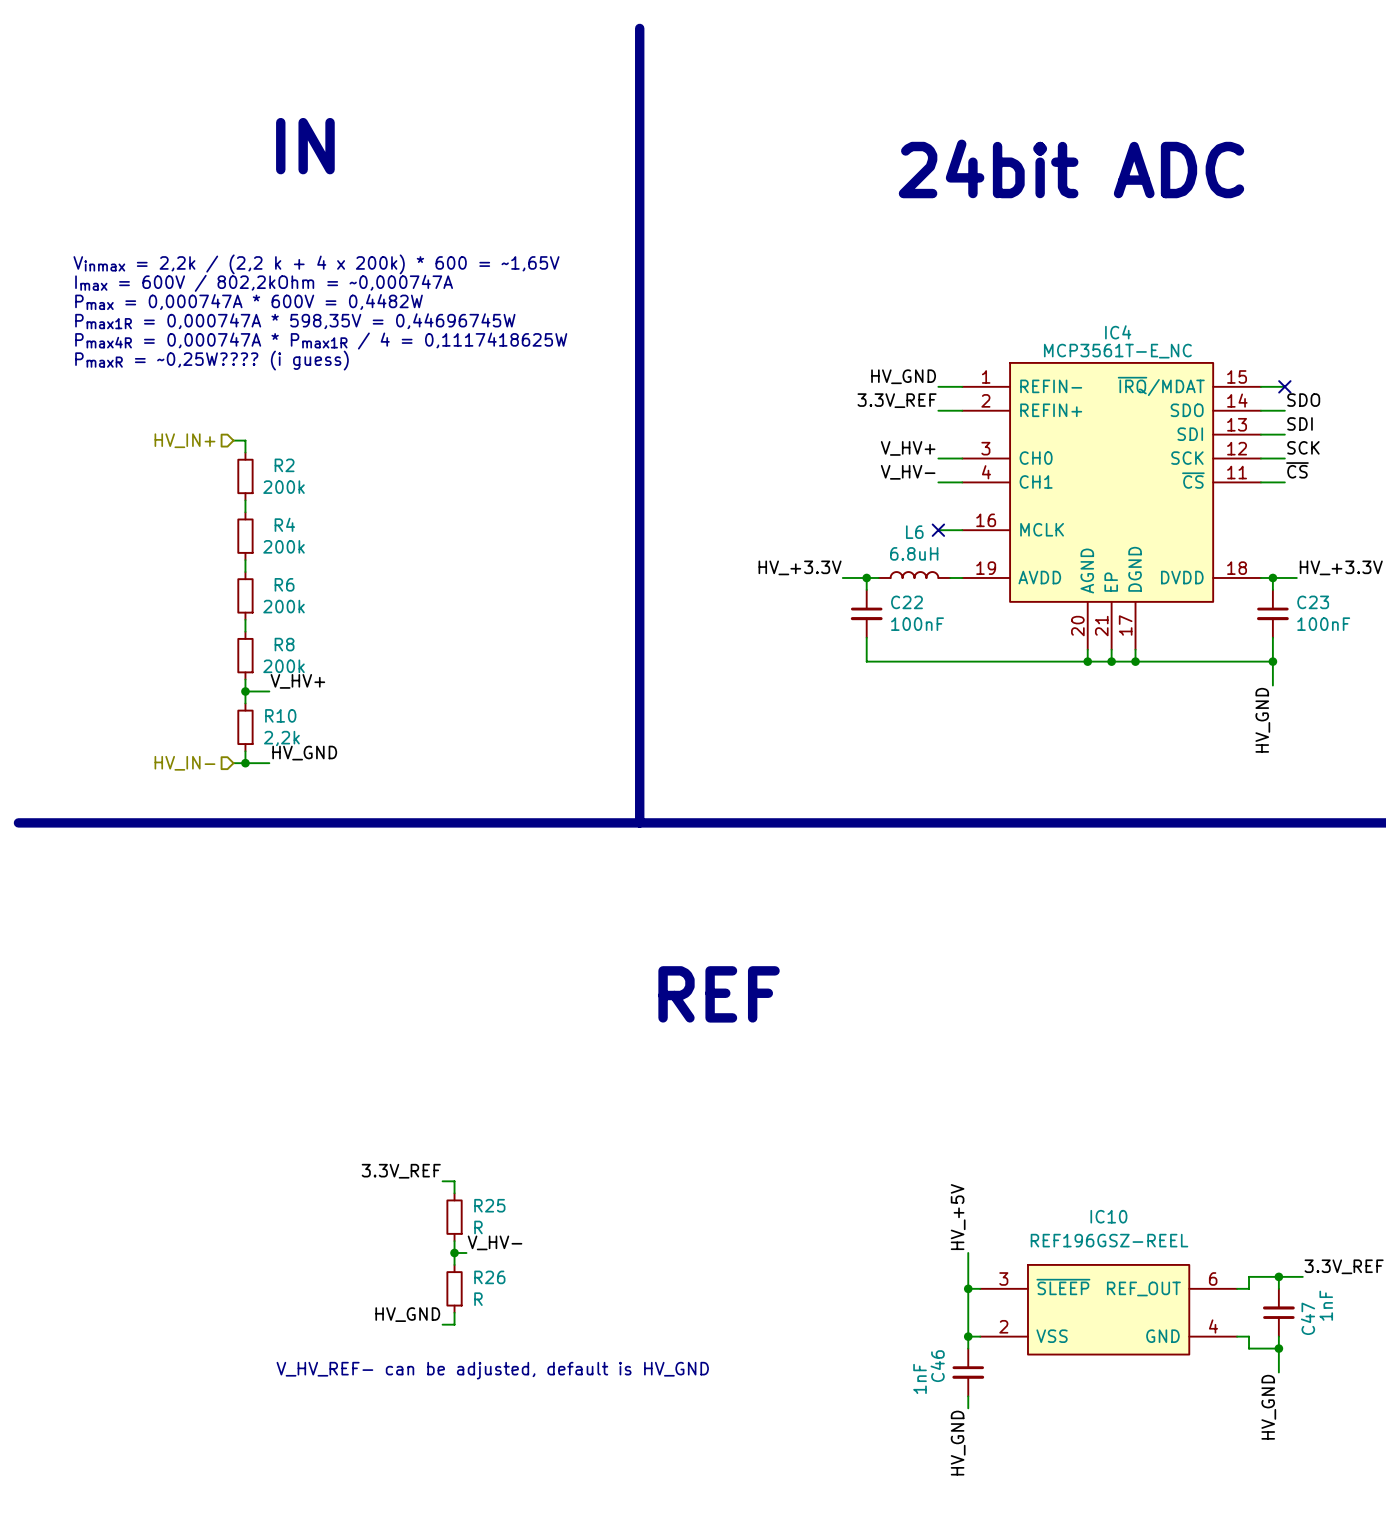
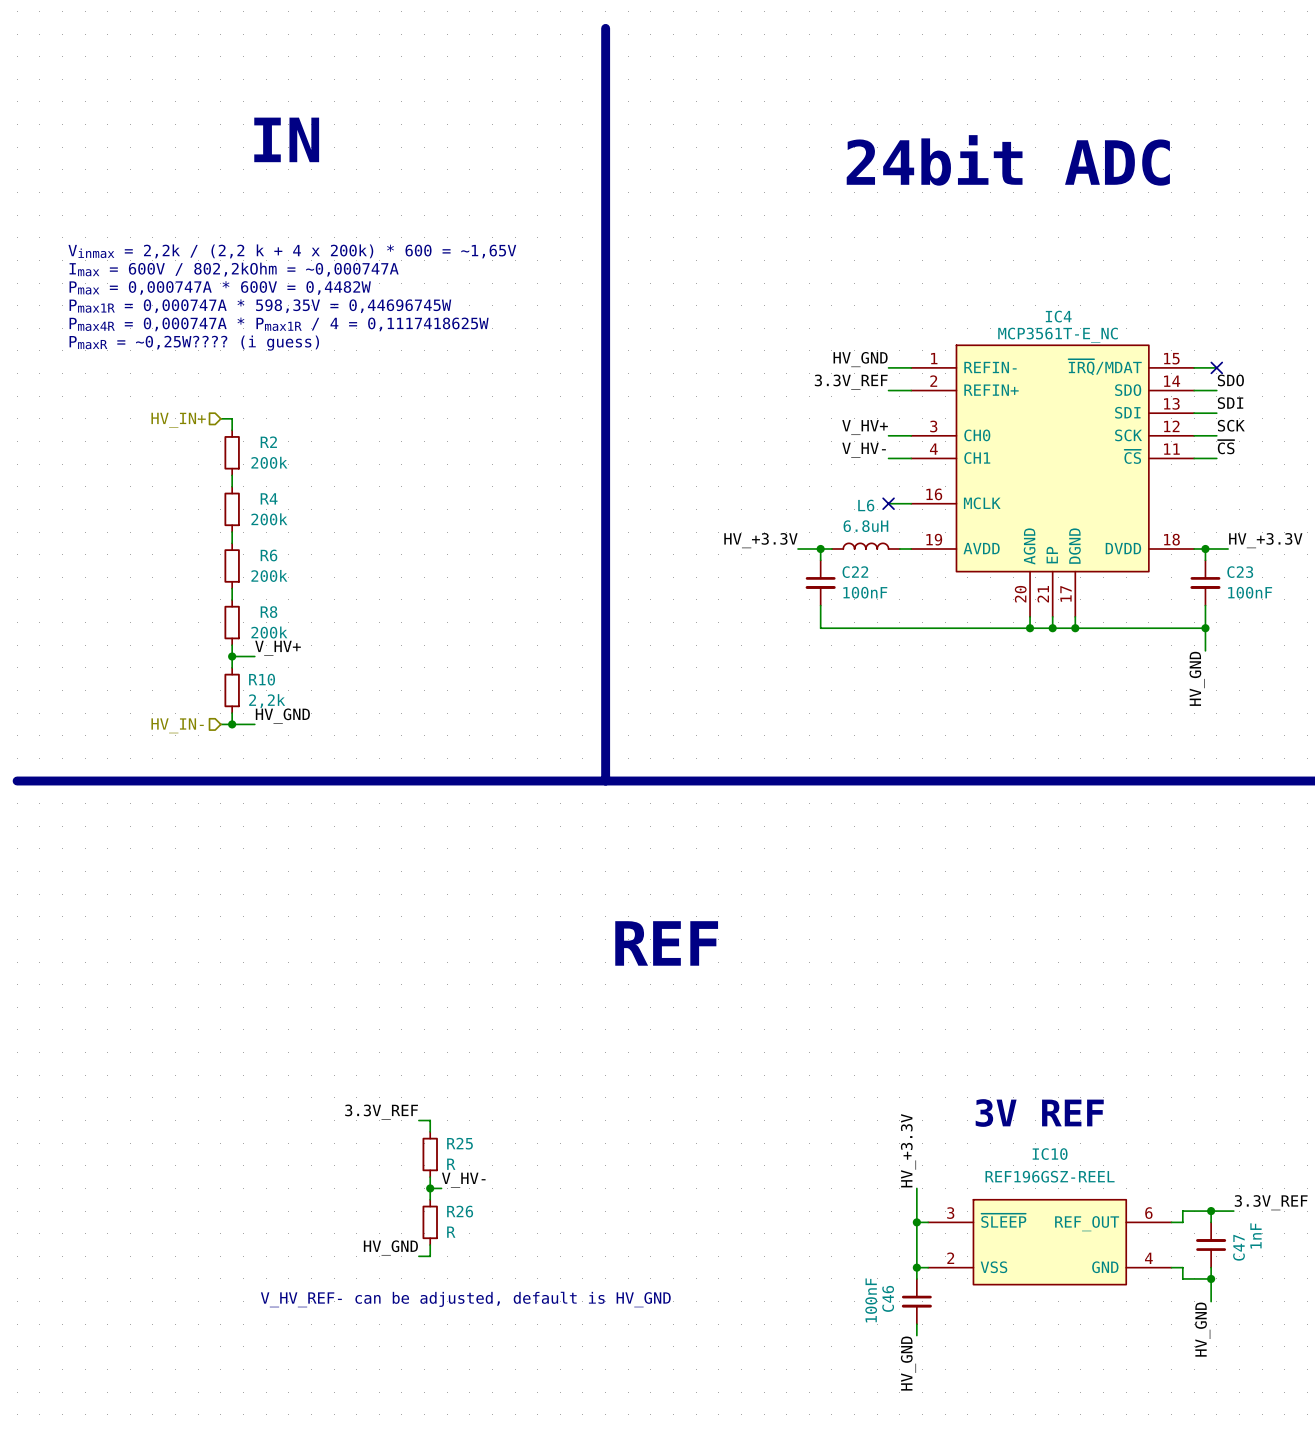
text: none -> 3V REF (1039, 1113)
label: HV_+5V (958, 1217) -> HV_+3.3V (908, 1150)
C46 value: 1nF (920, 1378) -> 100nF (871, 1300)

